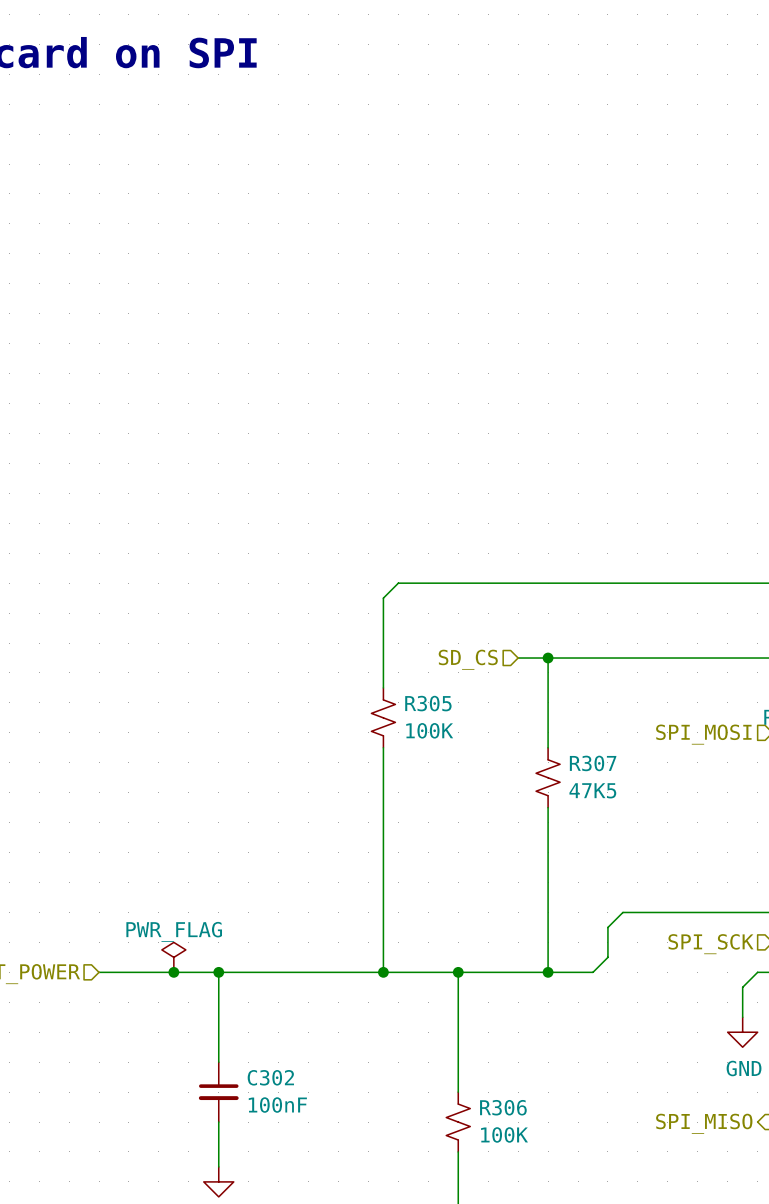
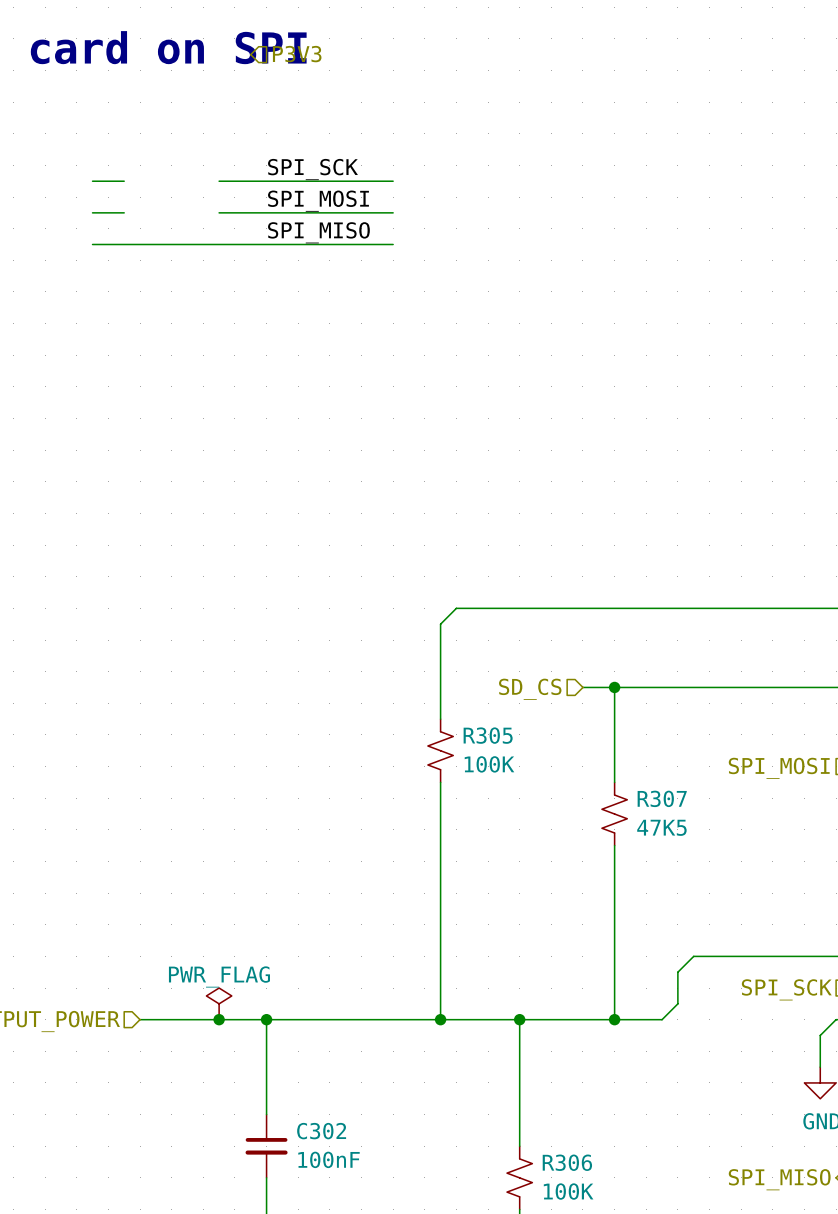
hierarchical label: none -> P3V3 (297, 54)
label: none -> SPI_SCK (312, 169)
wire: none -> (92, 181) (124, 181)
wire: none -> (219, 181) (393, 181)
label: none -> SPI_MOSI (318, 201)
wire: none -> (92, 212) (124, 212)
wire: none -> (219, 212) (393, 212)
label: none -> SPI_MISO (318, 232)
wire: none -> (92, 244) (393, 244)

